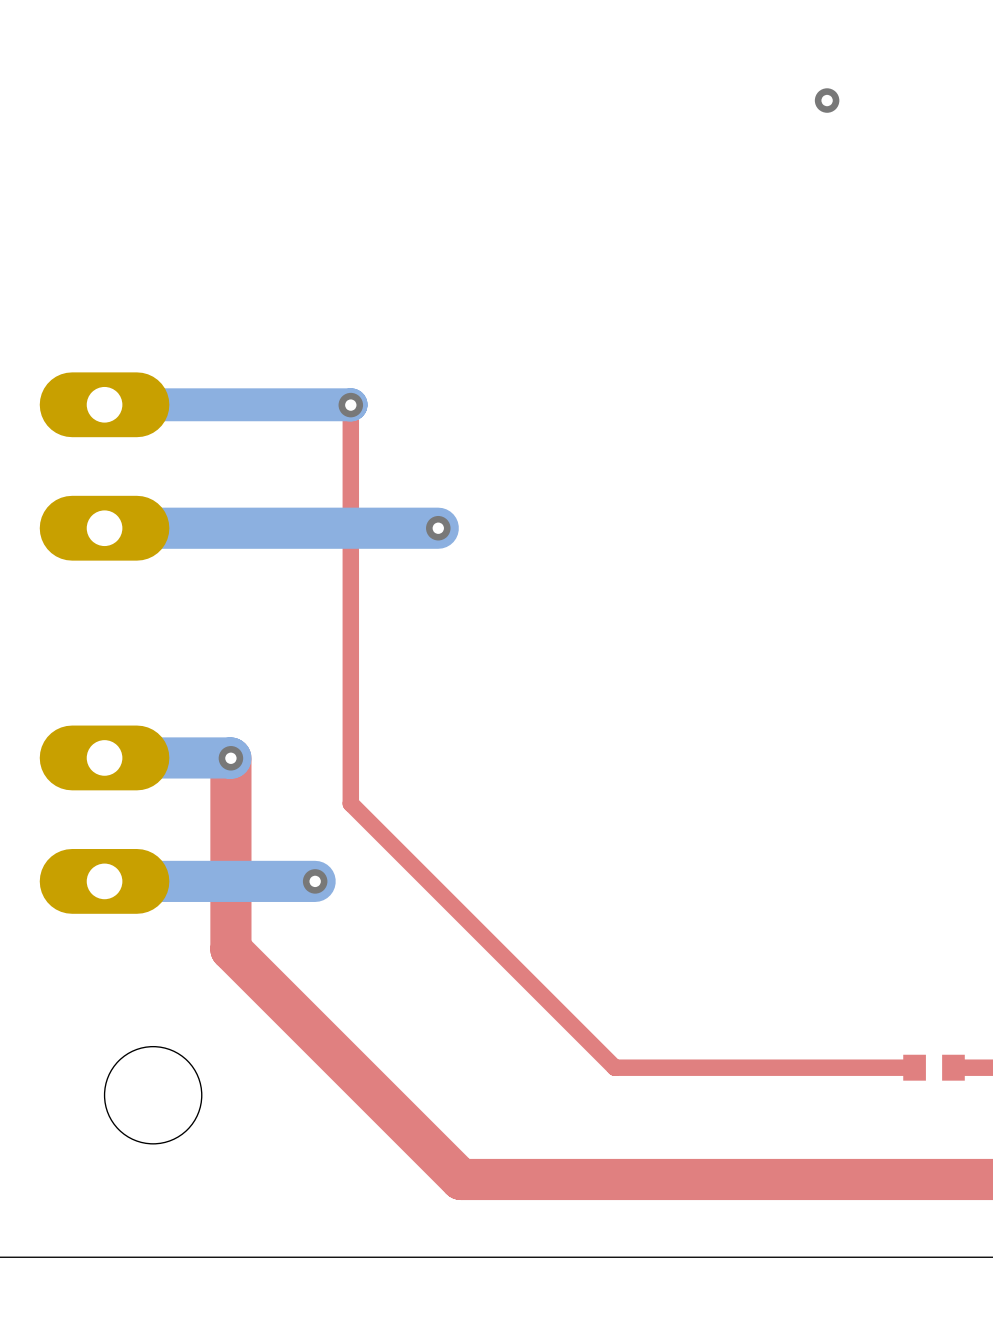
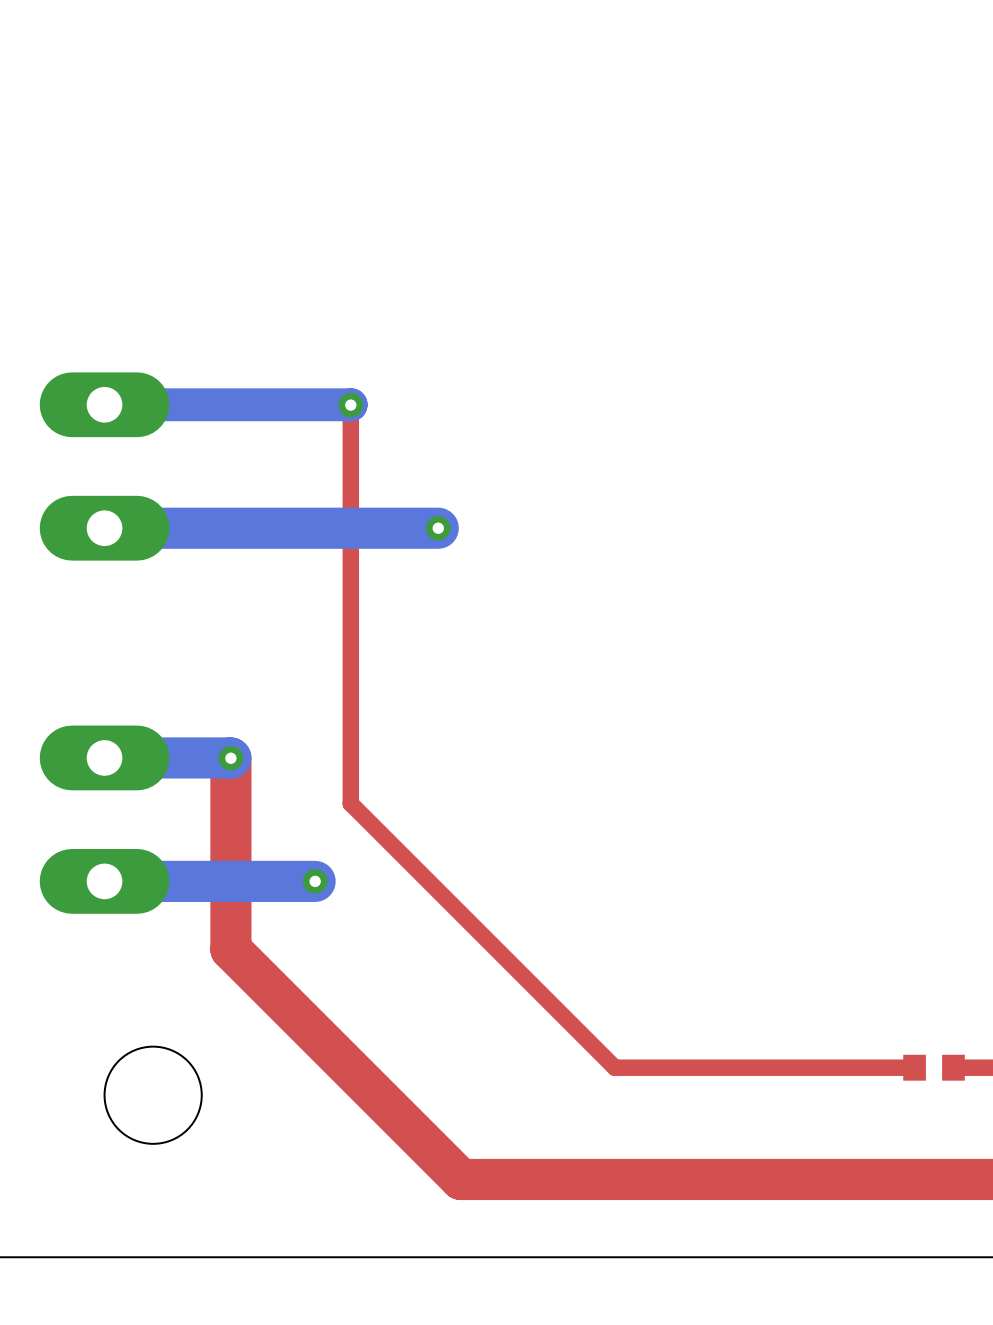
via: (827, 100) -> none

